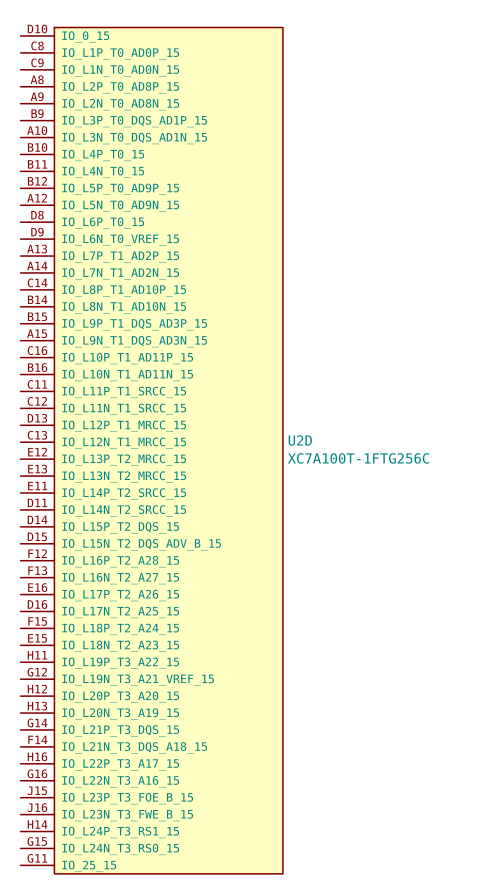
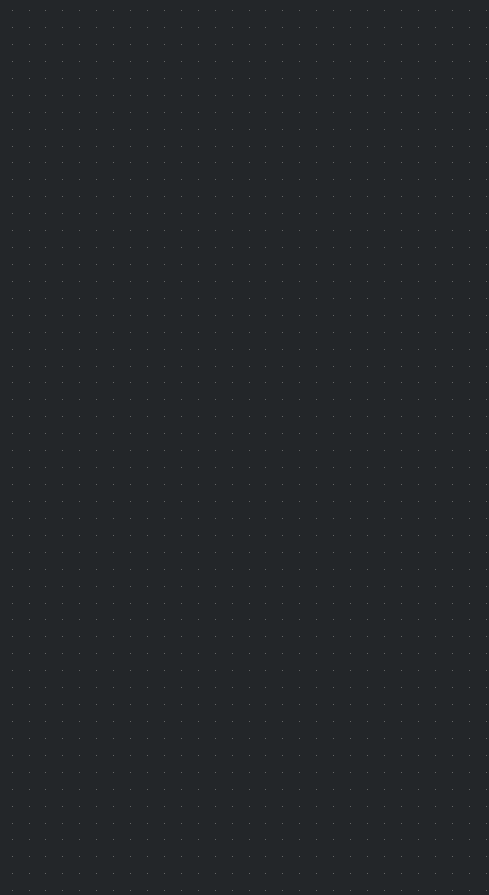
U2D: XC7A100T-1FTG256C (151, 450) -> none

